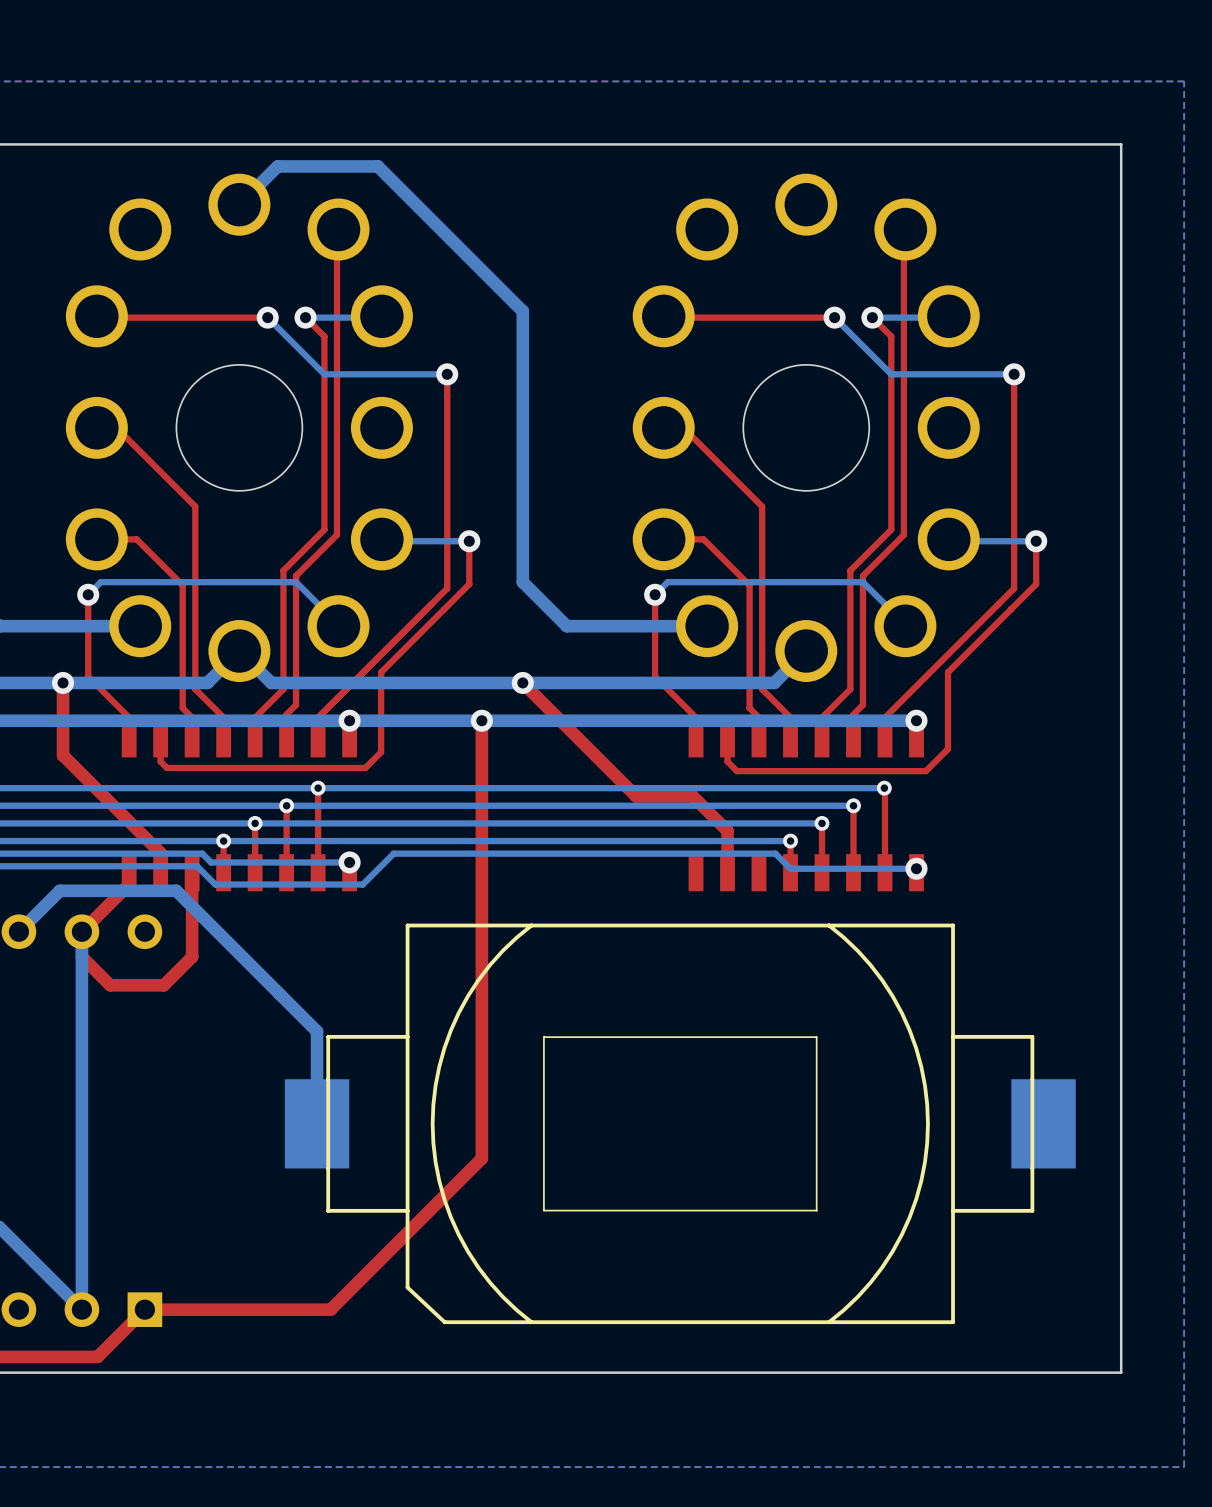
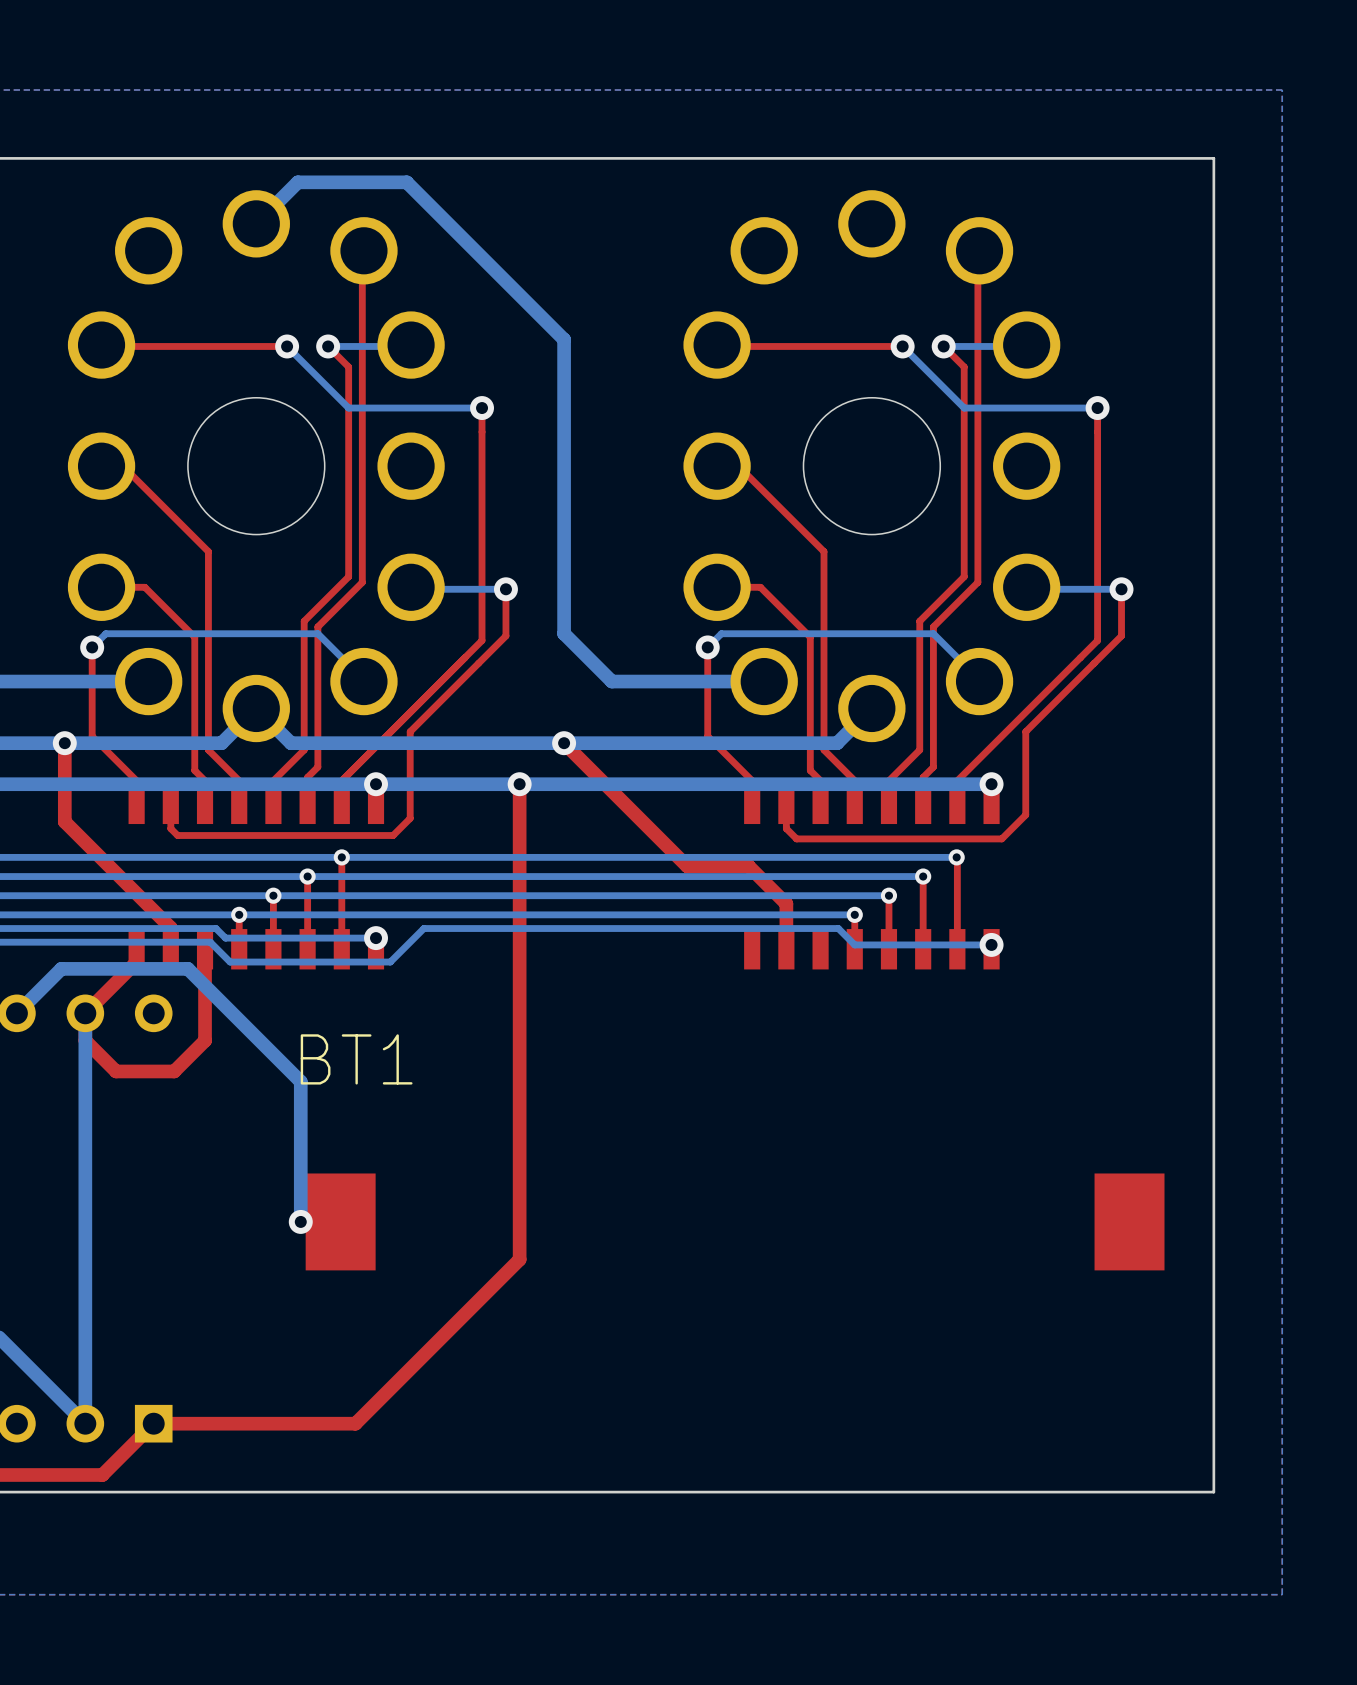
bottom track: (280, 994) (317, 1031) (317, 1123) -> (300, 1081) (300, 1221)
via: none -> (300, 1221)
BT1 side: bottom (680, 1123) -> top (735, 1221)

